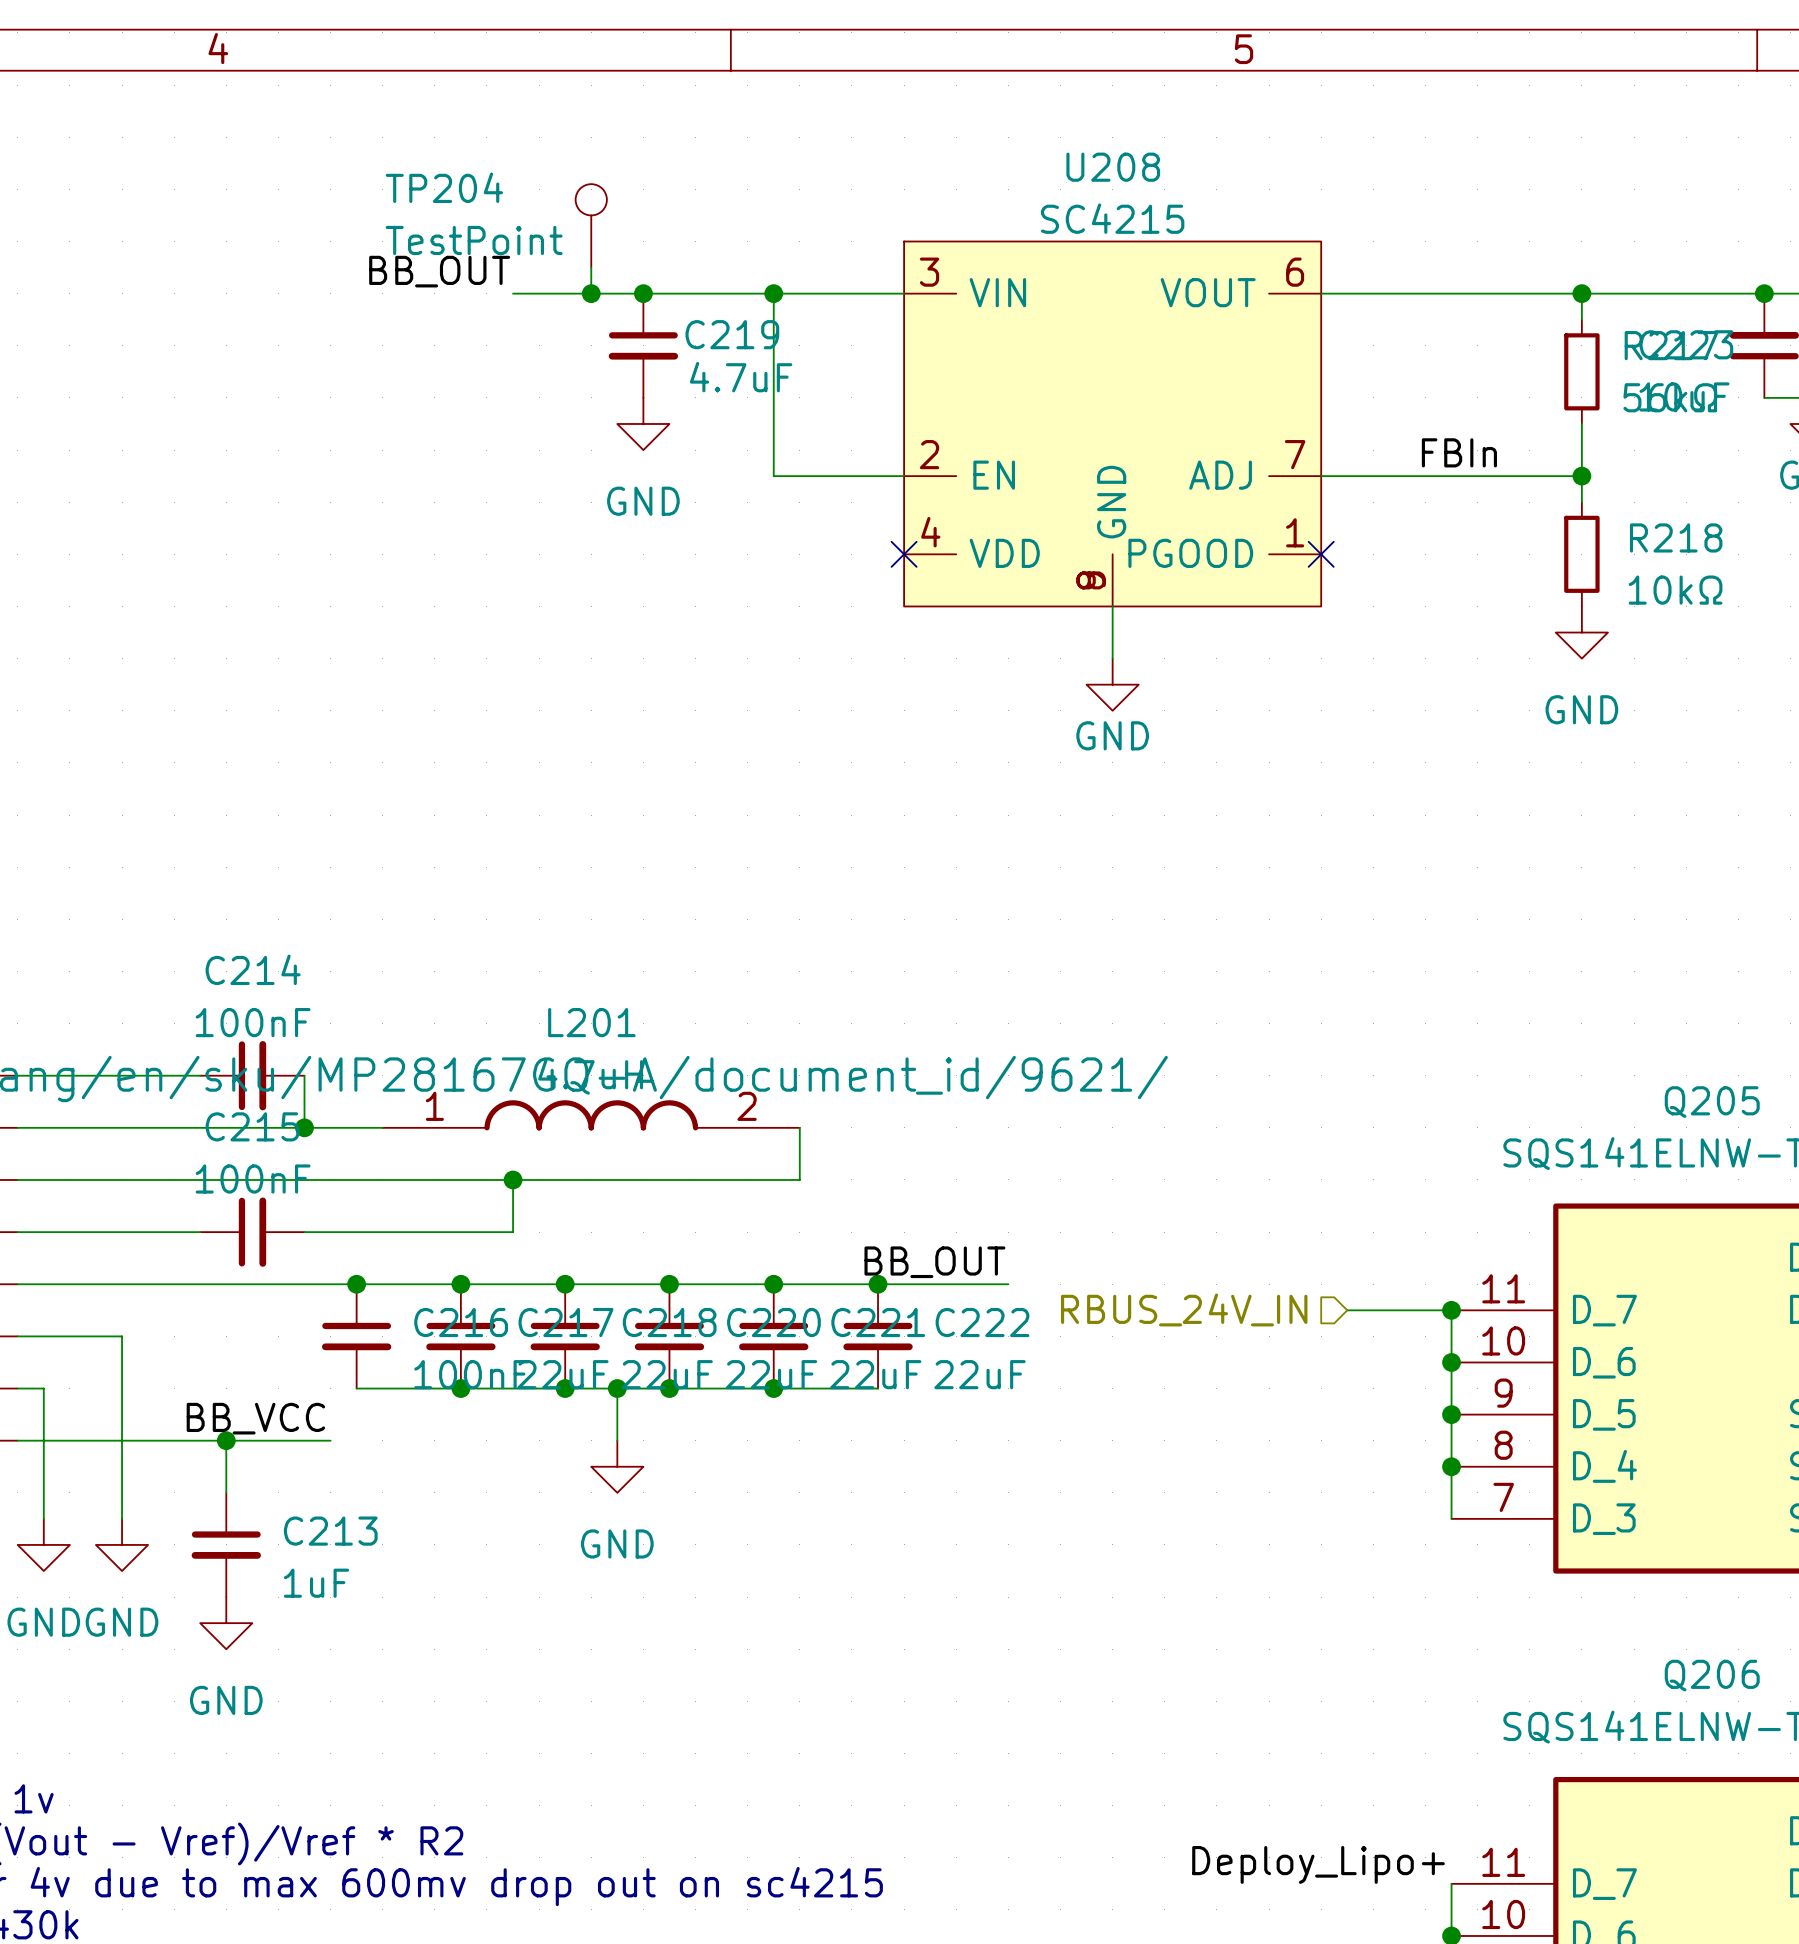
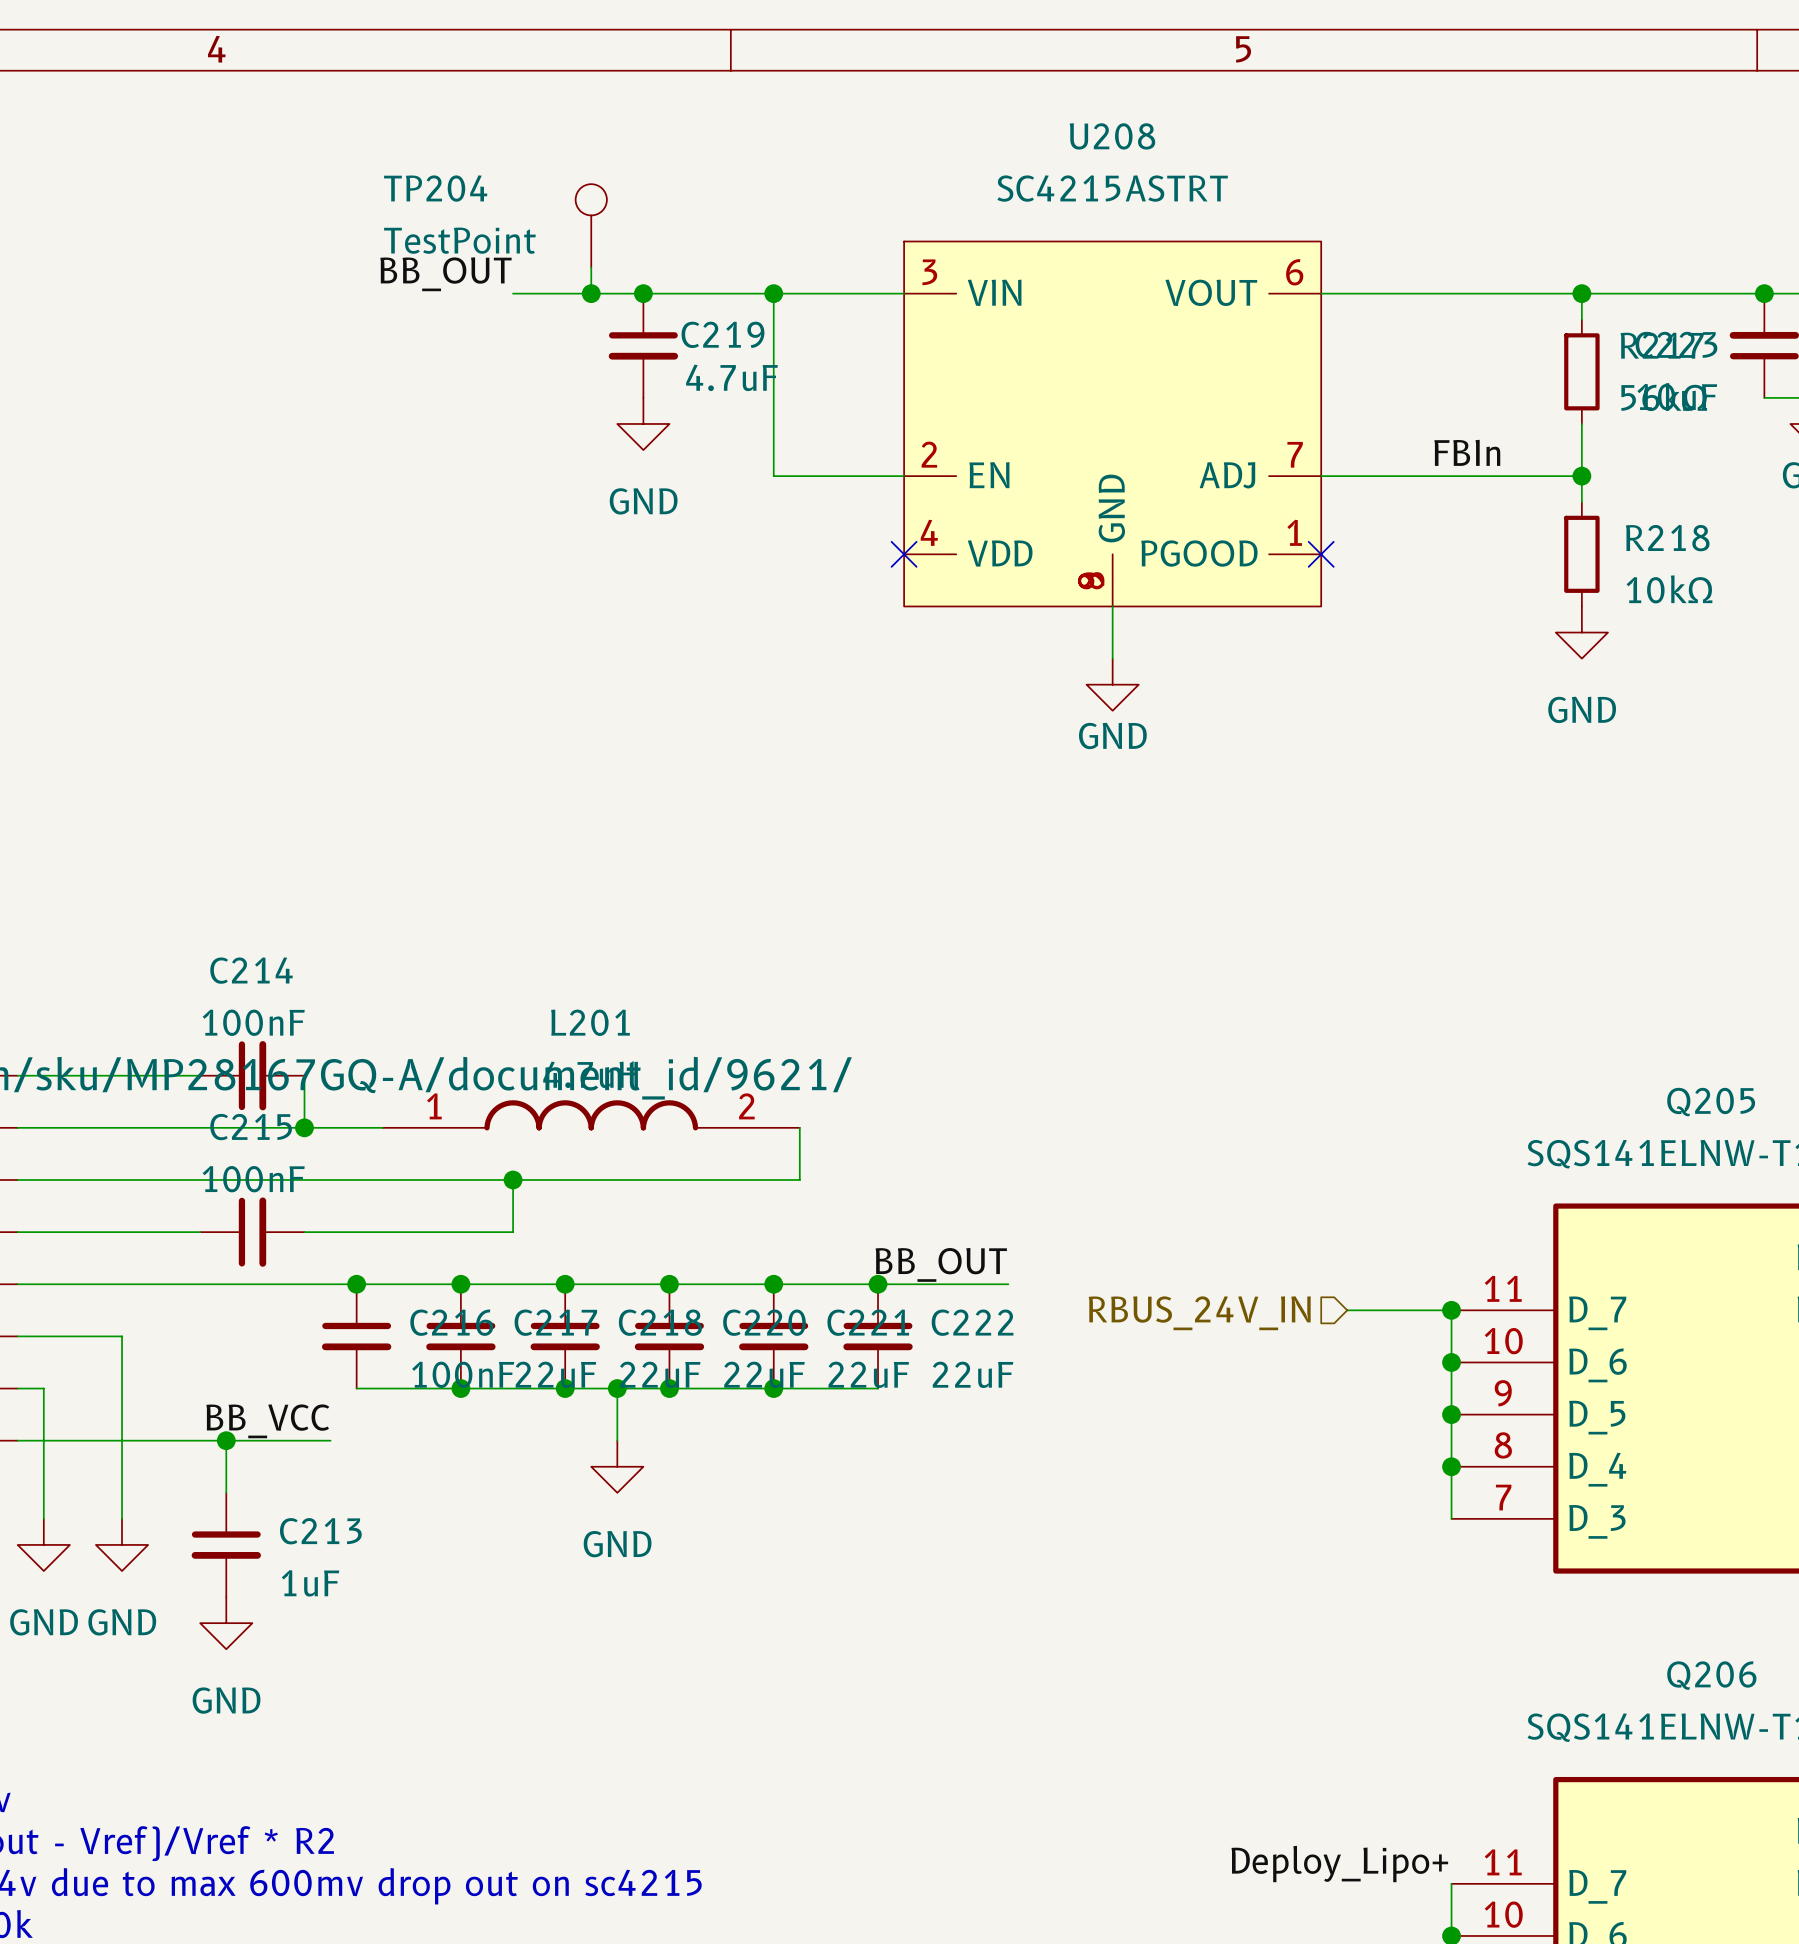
U208 name position: U208 (1113, 167) -> U208 (1112, 136)
U208 value: SC4215 (1112, 218) -> SC4215ASTRT (1112, 188)

